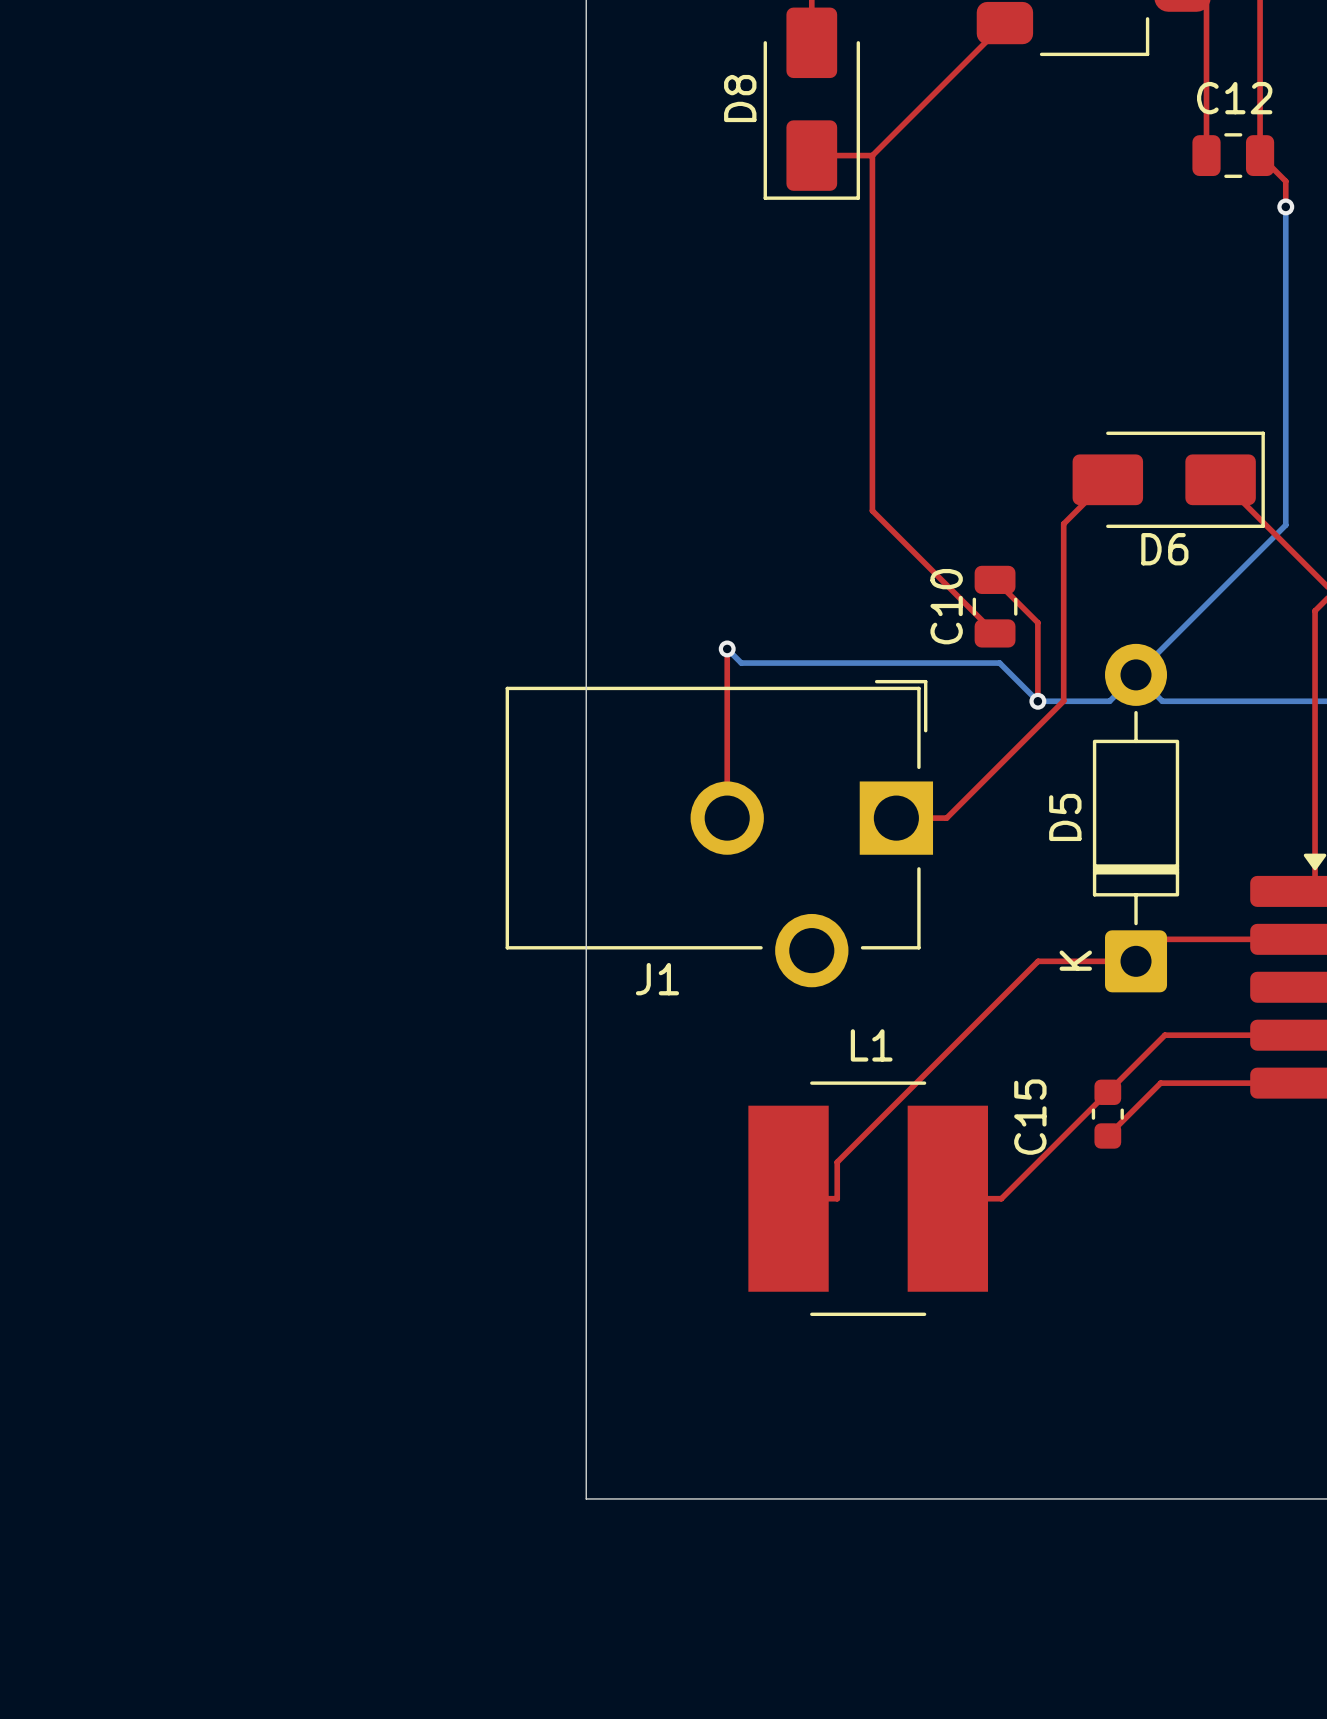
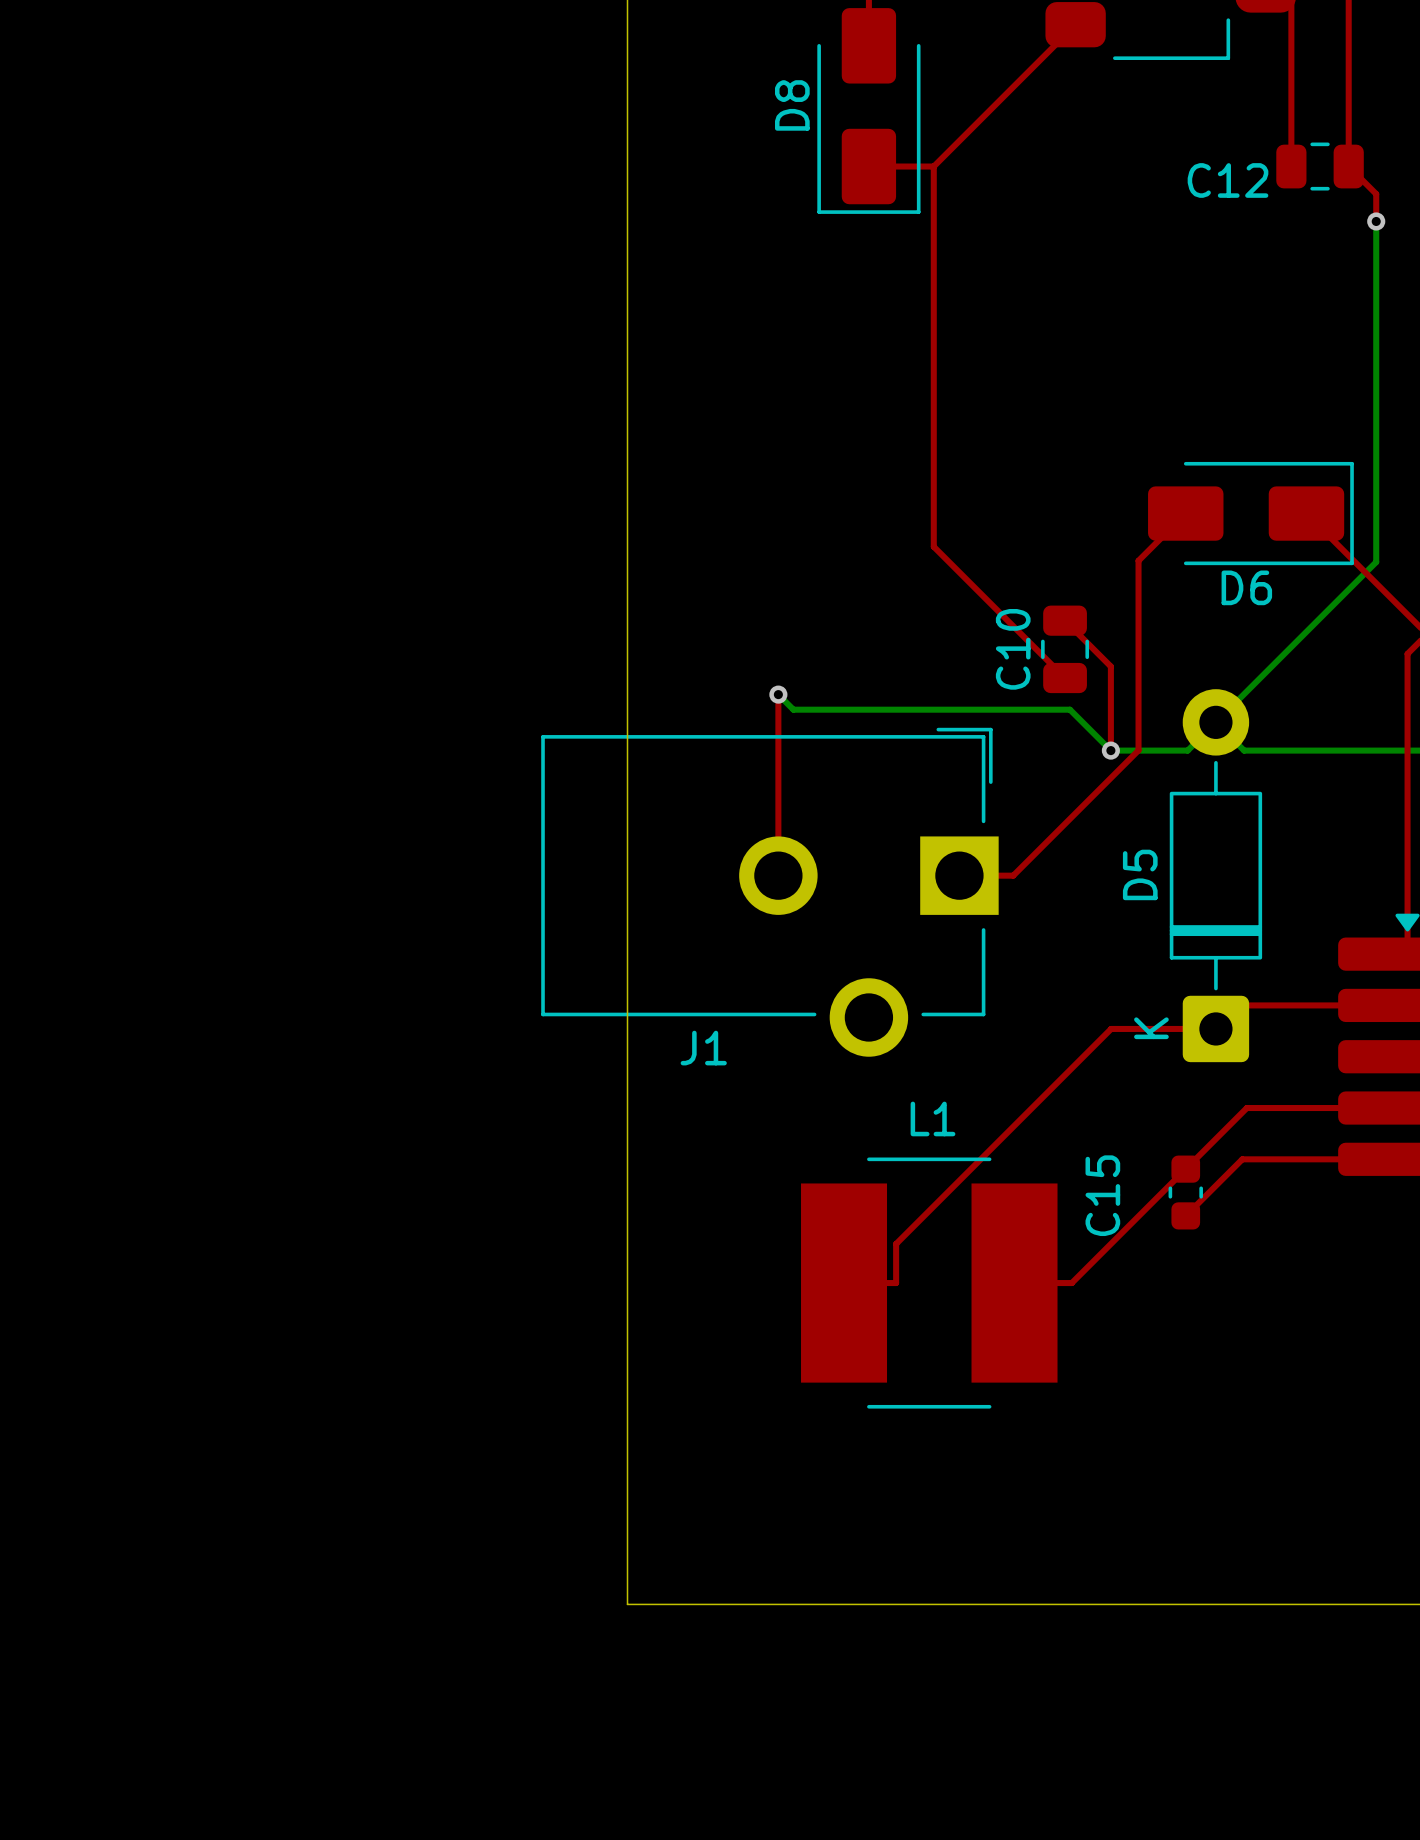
C12 name position: C12 (1234, 98) -> C12 (1228, 180)

